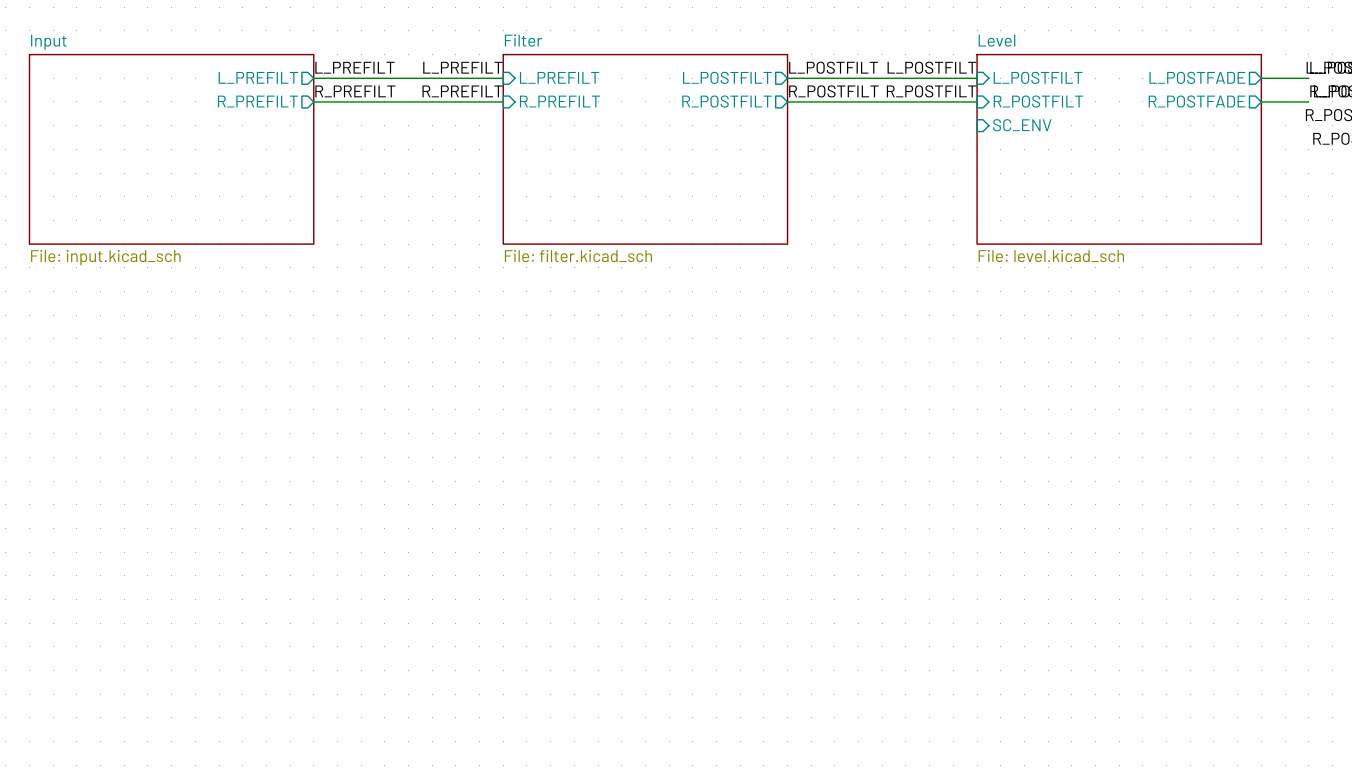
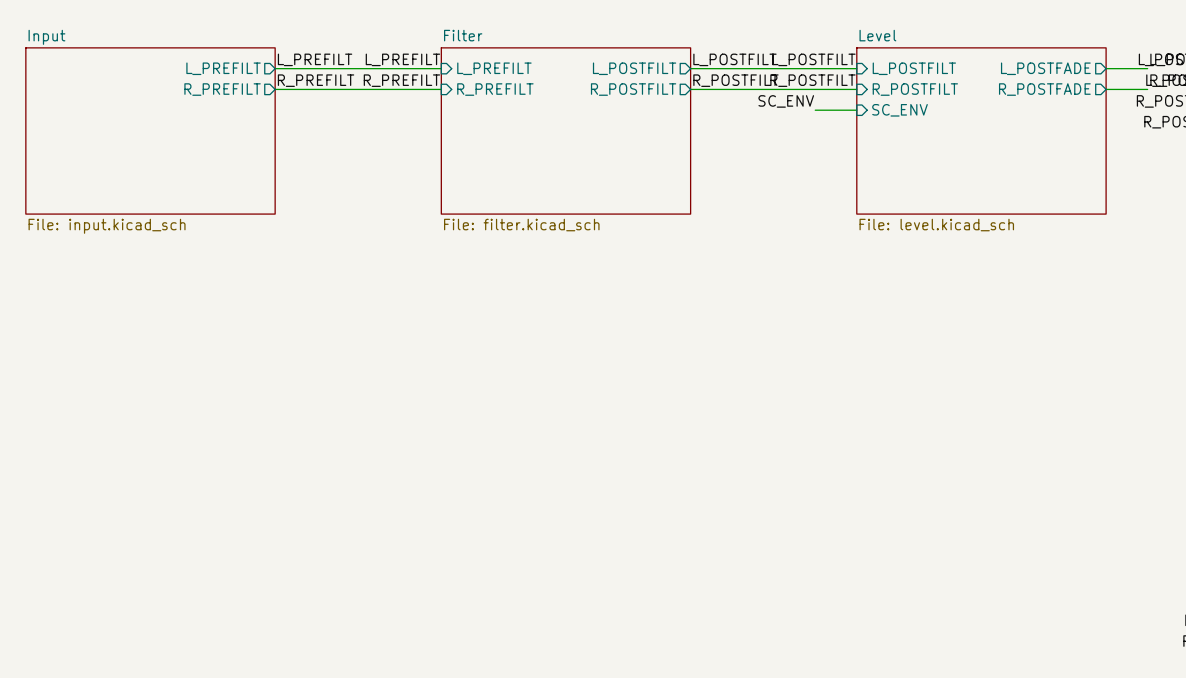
label: none -> SC_ENV (786, 101)
wire: none -> (815, 110) (856, 110)

